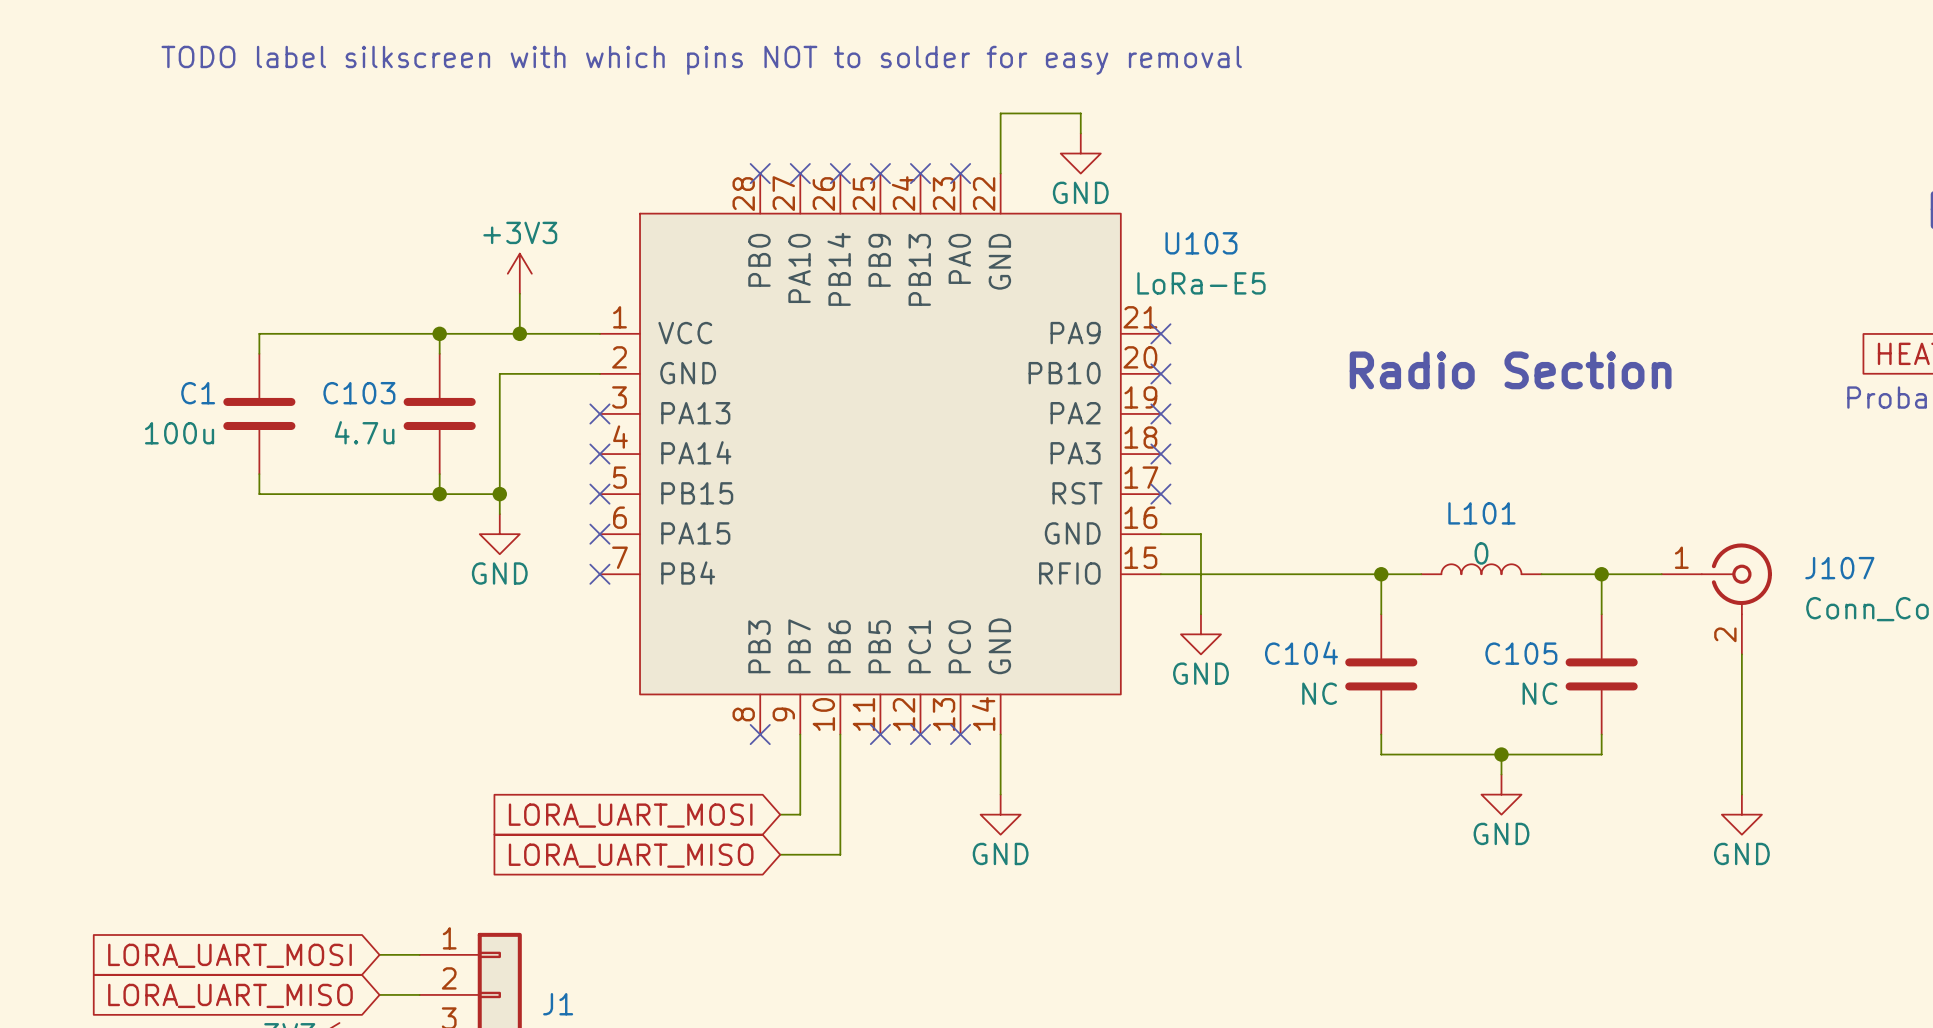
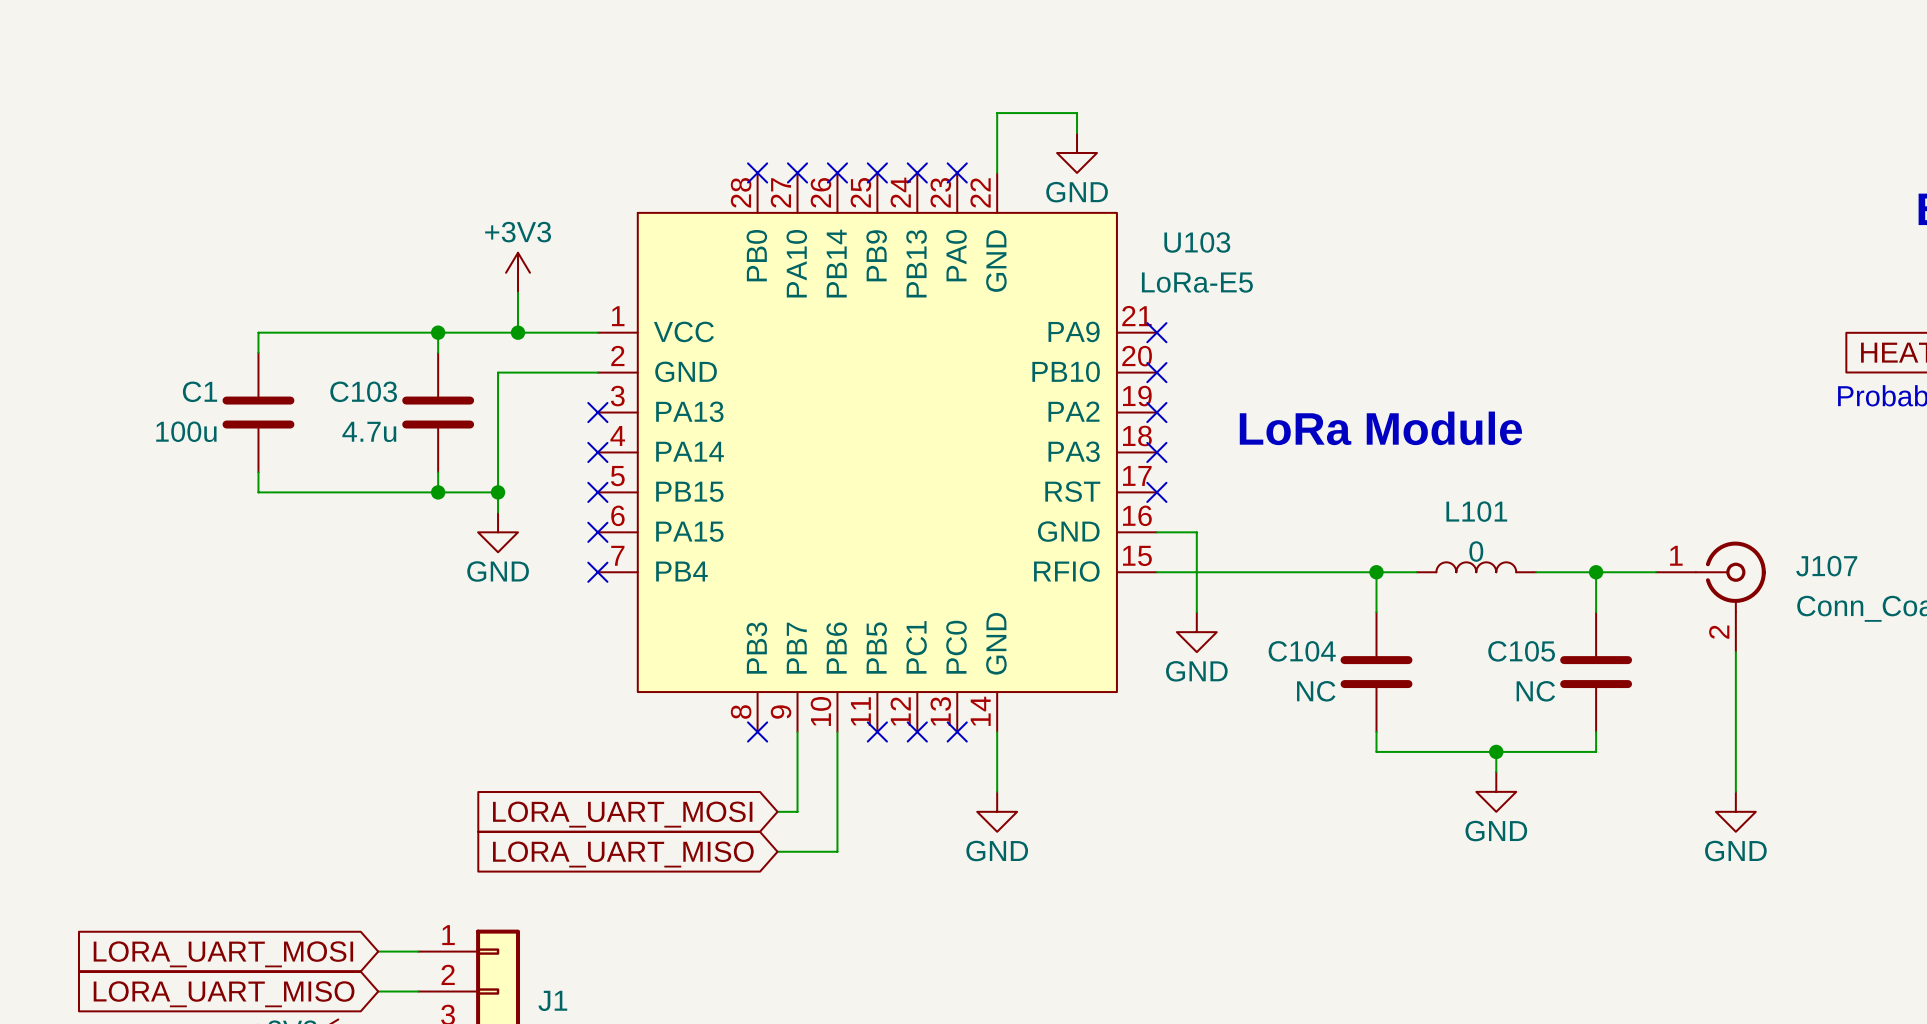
text: TODO label silkscreen with which pins NOT to solder for easy removal (701, 60) -> none
text: Radio Section (1510, 370) -> none
text: none -> LoRa Module (1380, 428)

